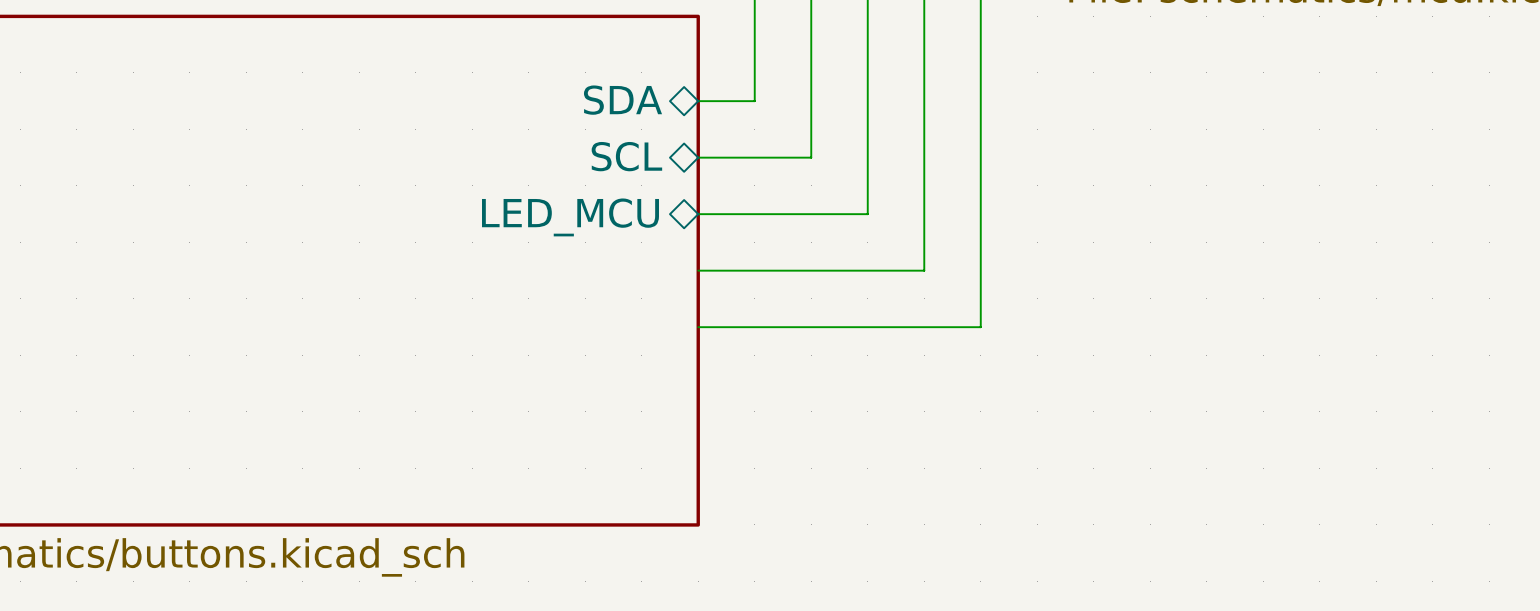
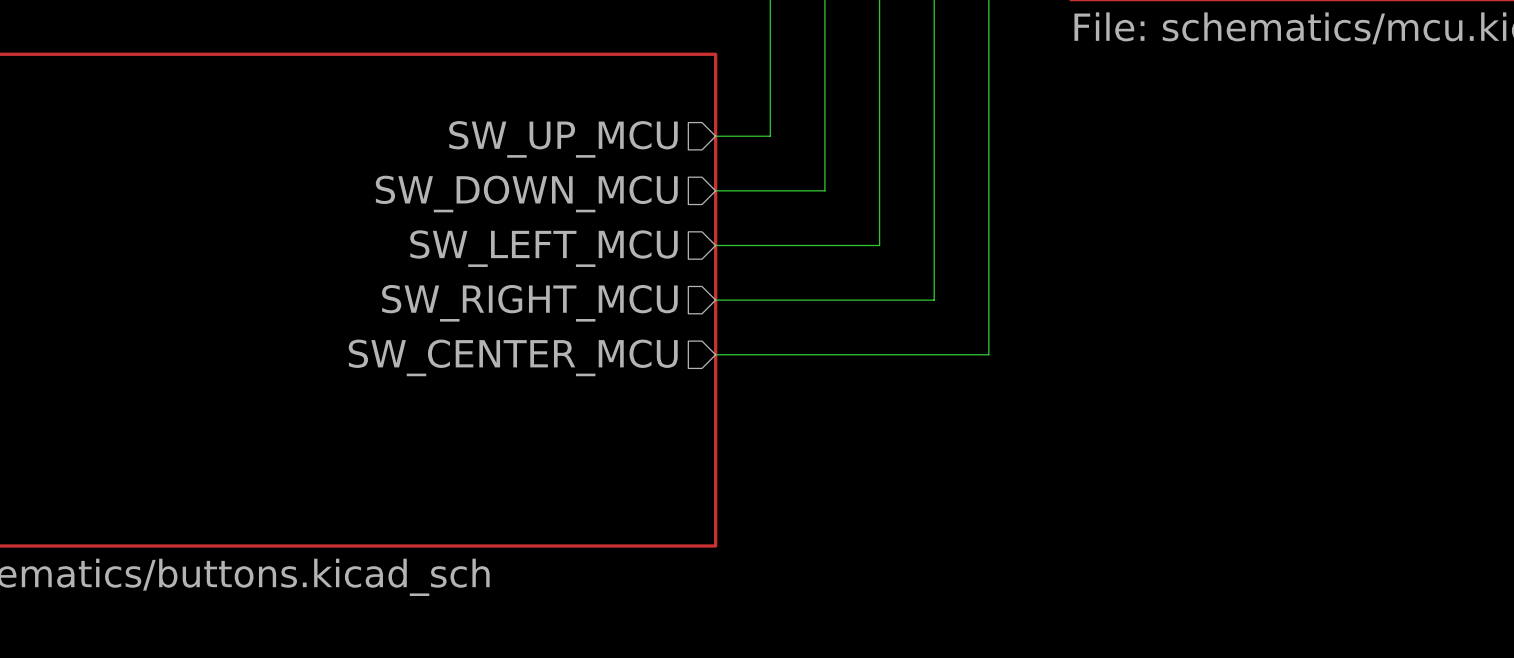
sheet pin shape: bidirectional (623, 100) -> output (563, 139)
sheet pin: SDA (623, 100) -> SW_UP_MCU (563, 139)
sheet pin shape: bidirectional (626, 156) -> output (526, 194)
sheet pin: SCL (626, 156) -> SW_DOWN_MCU (526, 194)
sheet pin shape: bidirectional (570, 217) -> output (543, 248)
sheet pin: LED_MCU (570, 217) -> SW_LEFT_MCU (543, 248)
sheet pin: none -> SW_RIGHT_MCU (529, 303)
sheet pin: none -> SW_CENTER_MCU (513, 357)

